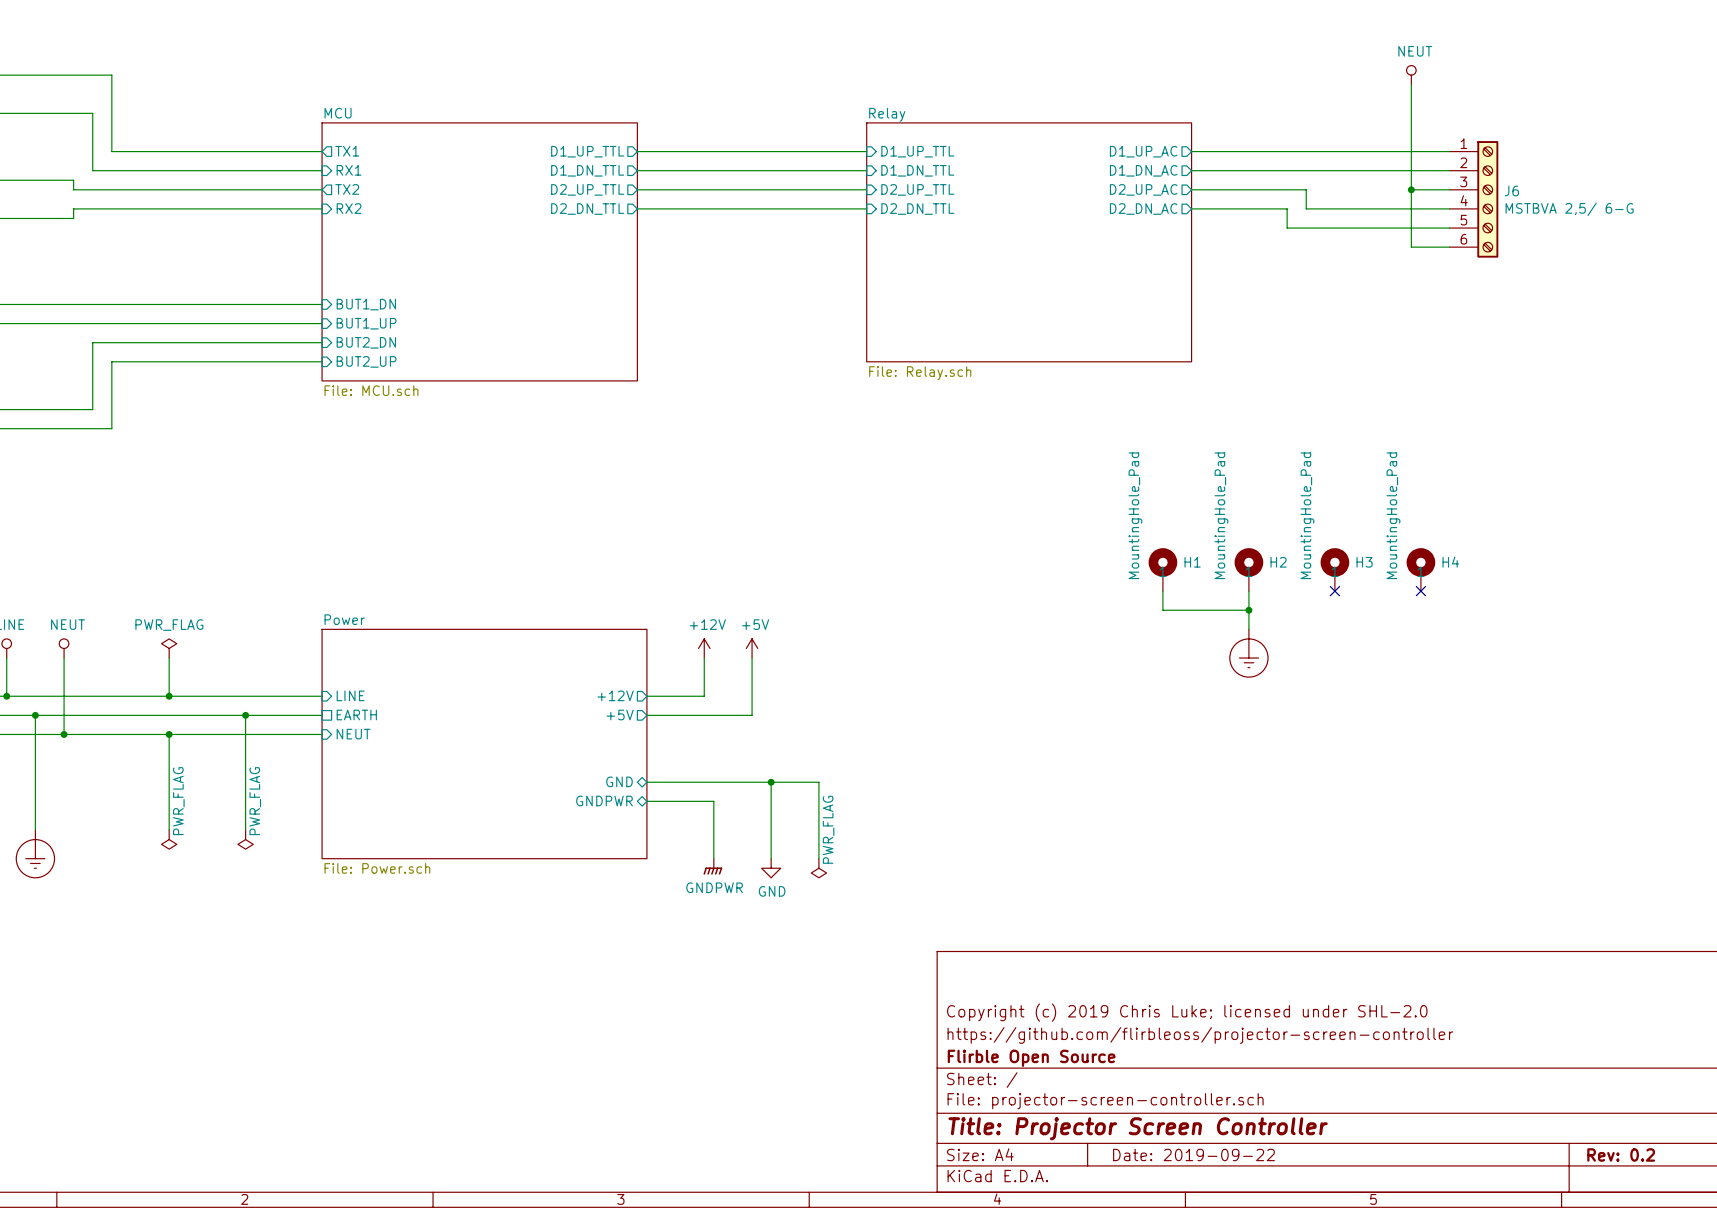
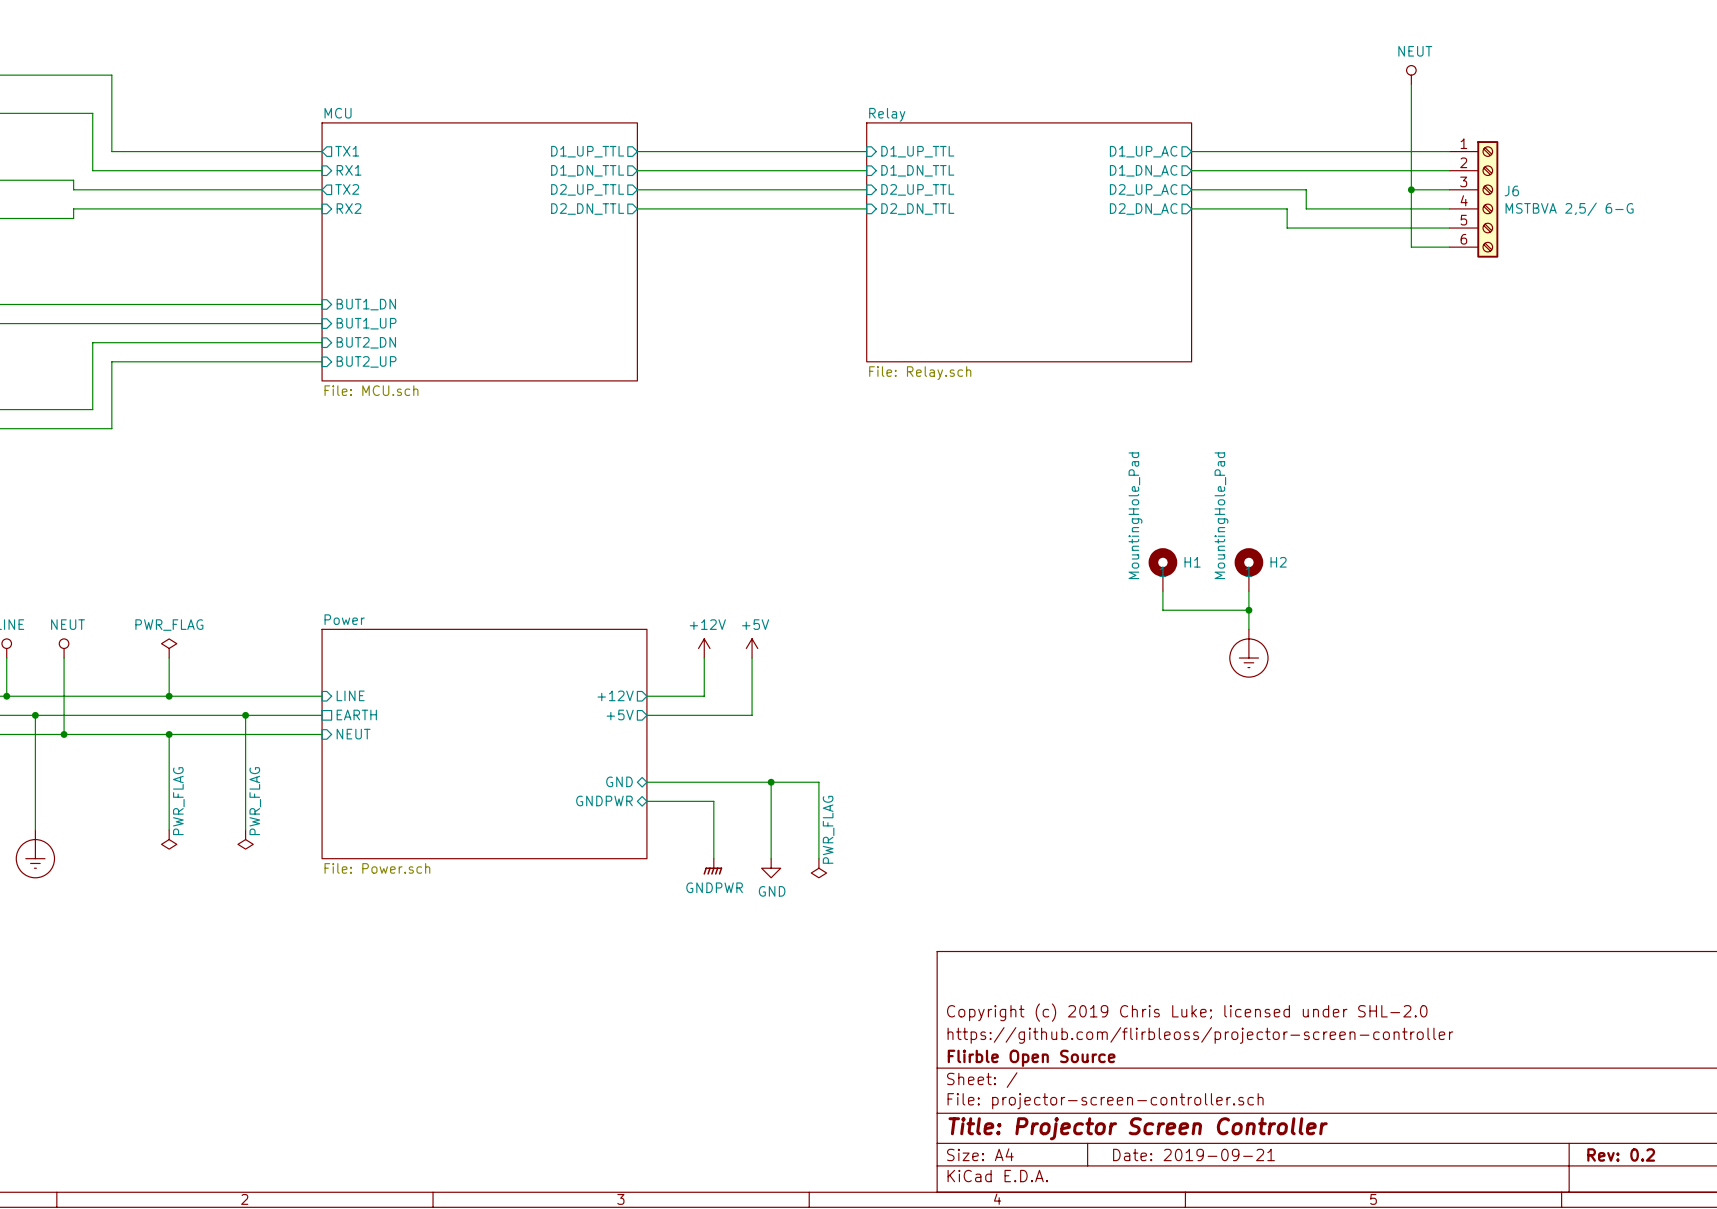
H3: MountingHole_Pad (1334, 569) -> none
H4: MountingHole_Pad (1420, 569) -> none
no-connect mark: (1334, 591) -> none
no-connect mark: (1420, 591) -> none
title block: Date: 2019-09-22 (1193, 1154) -> Date: 2019-09-21 (1193, 1154)

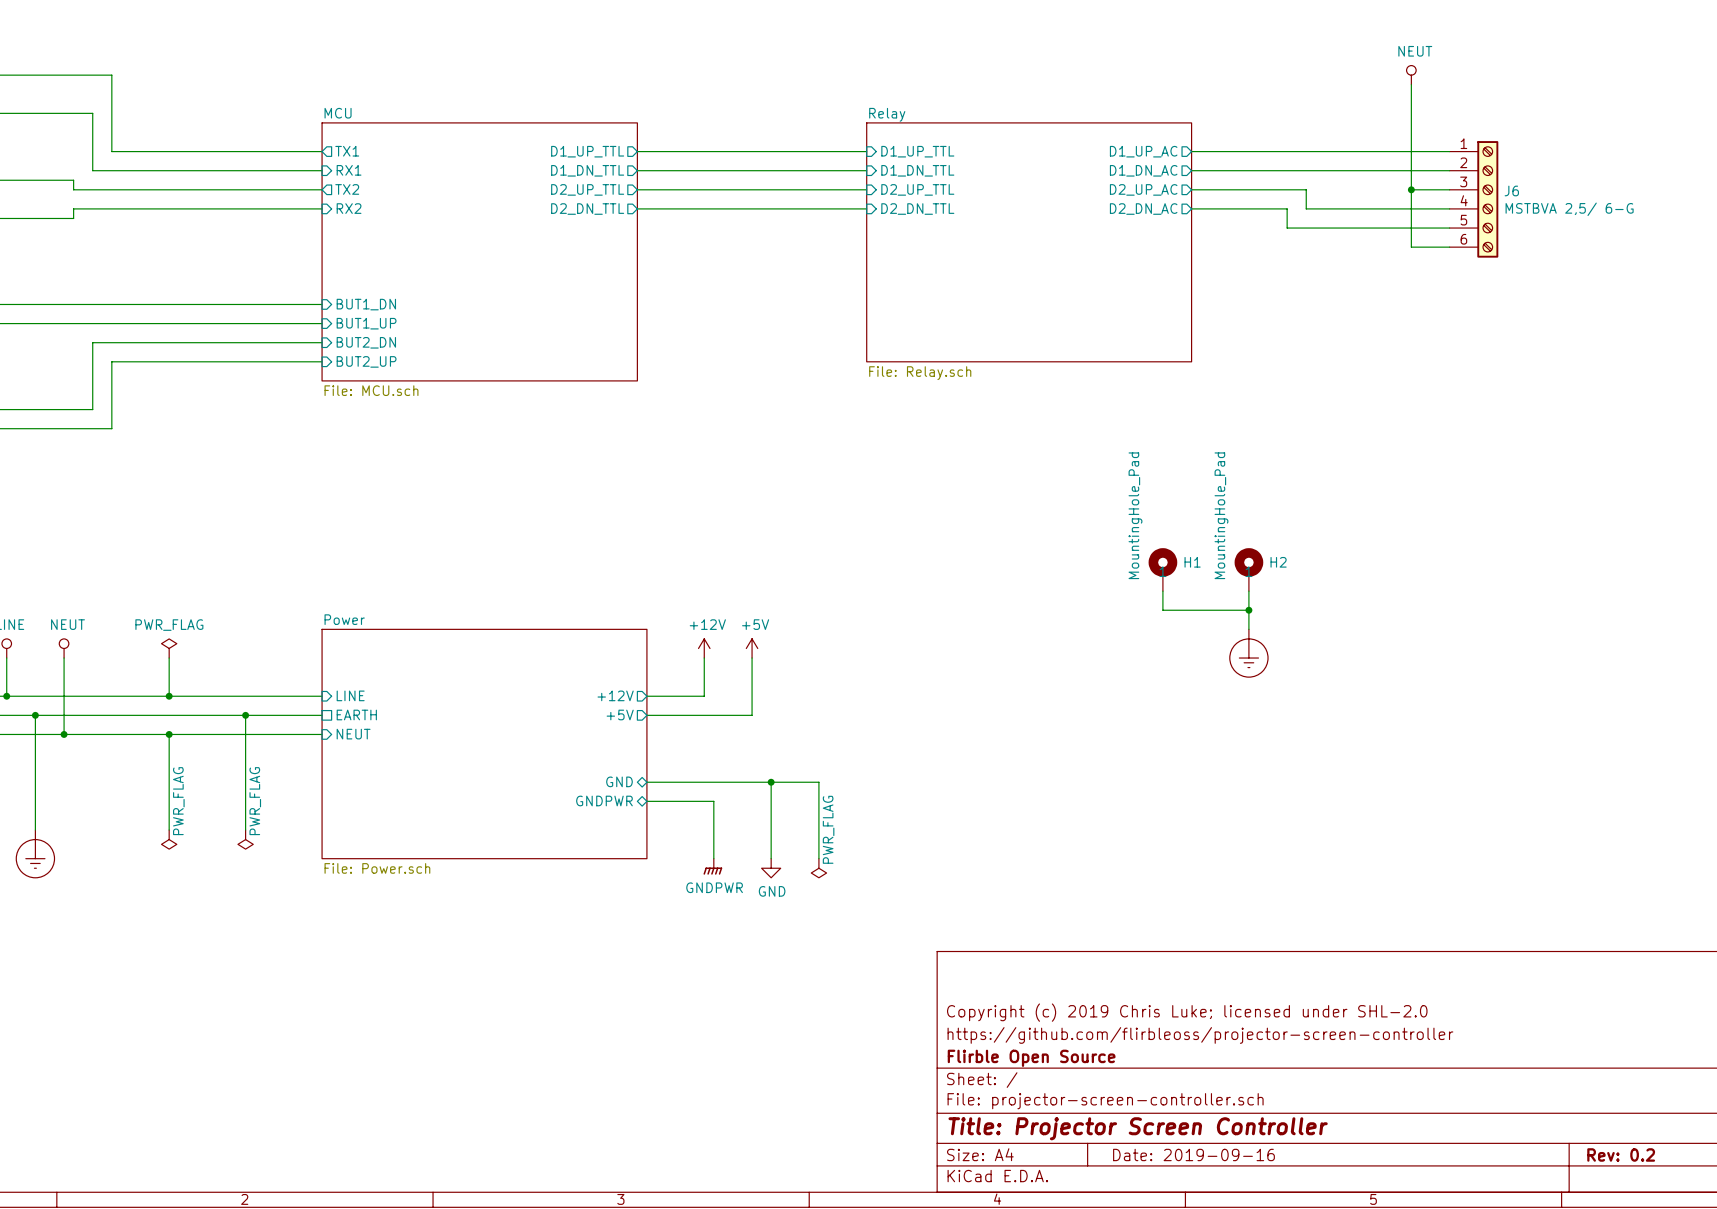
title block: Date: 2019-09-21 (1193, 1154) -> Date: 2019-09-16 (1193, 1154)

